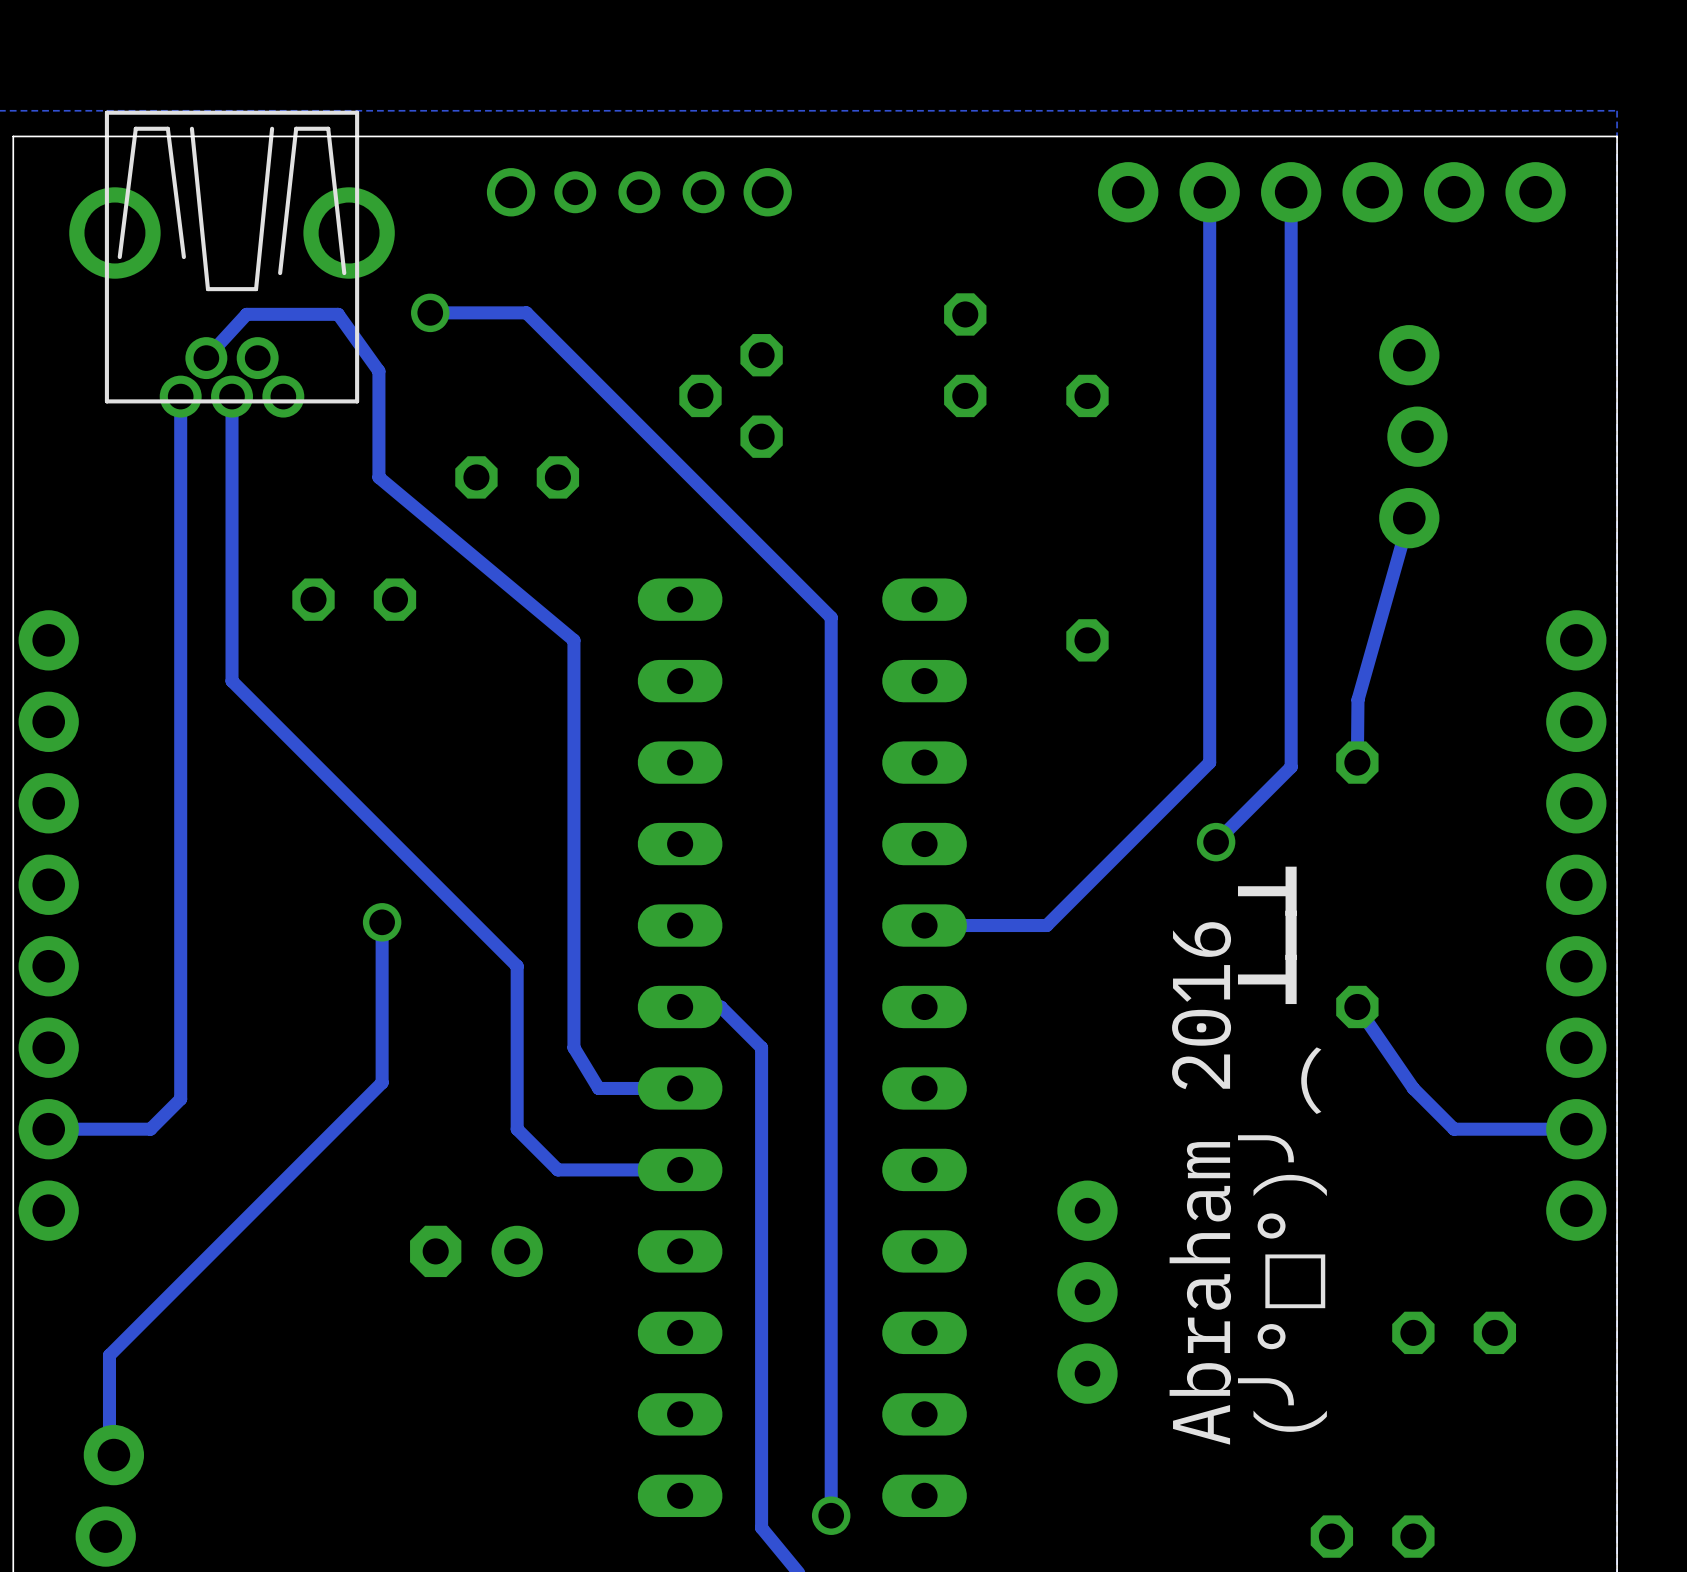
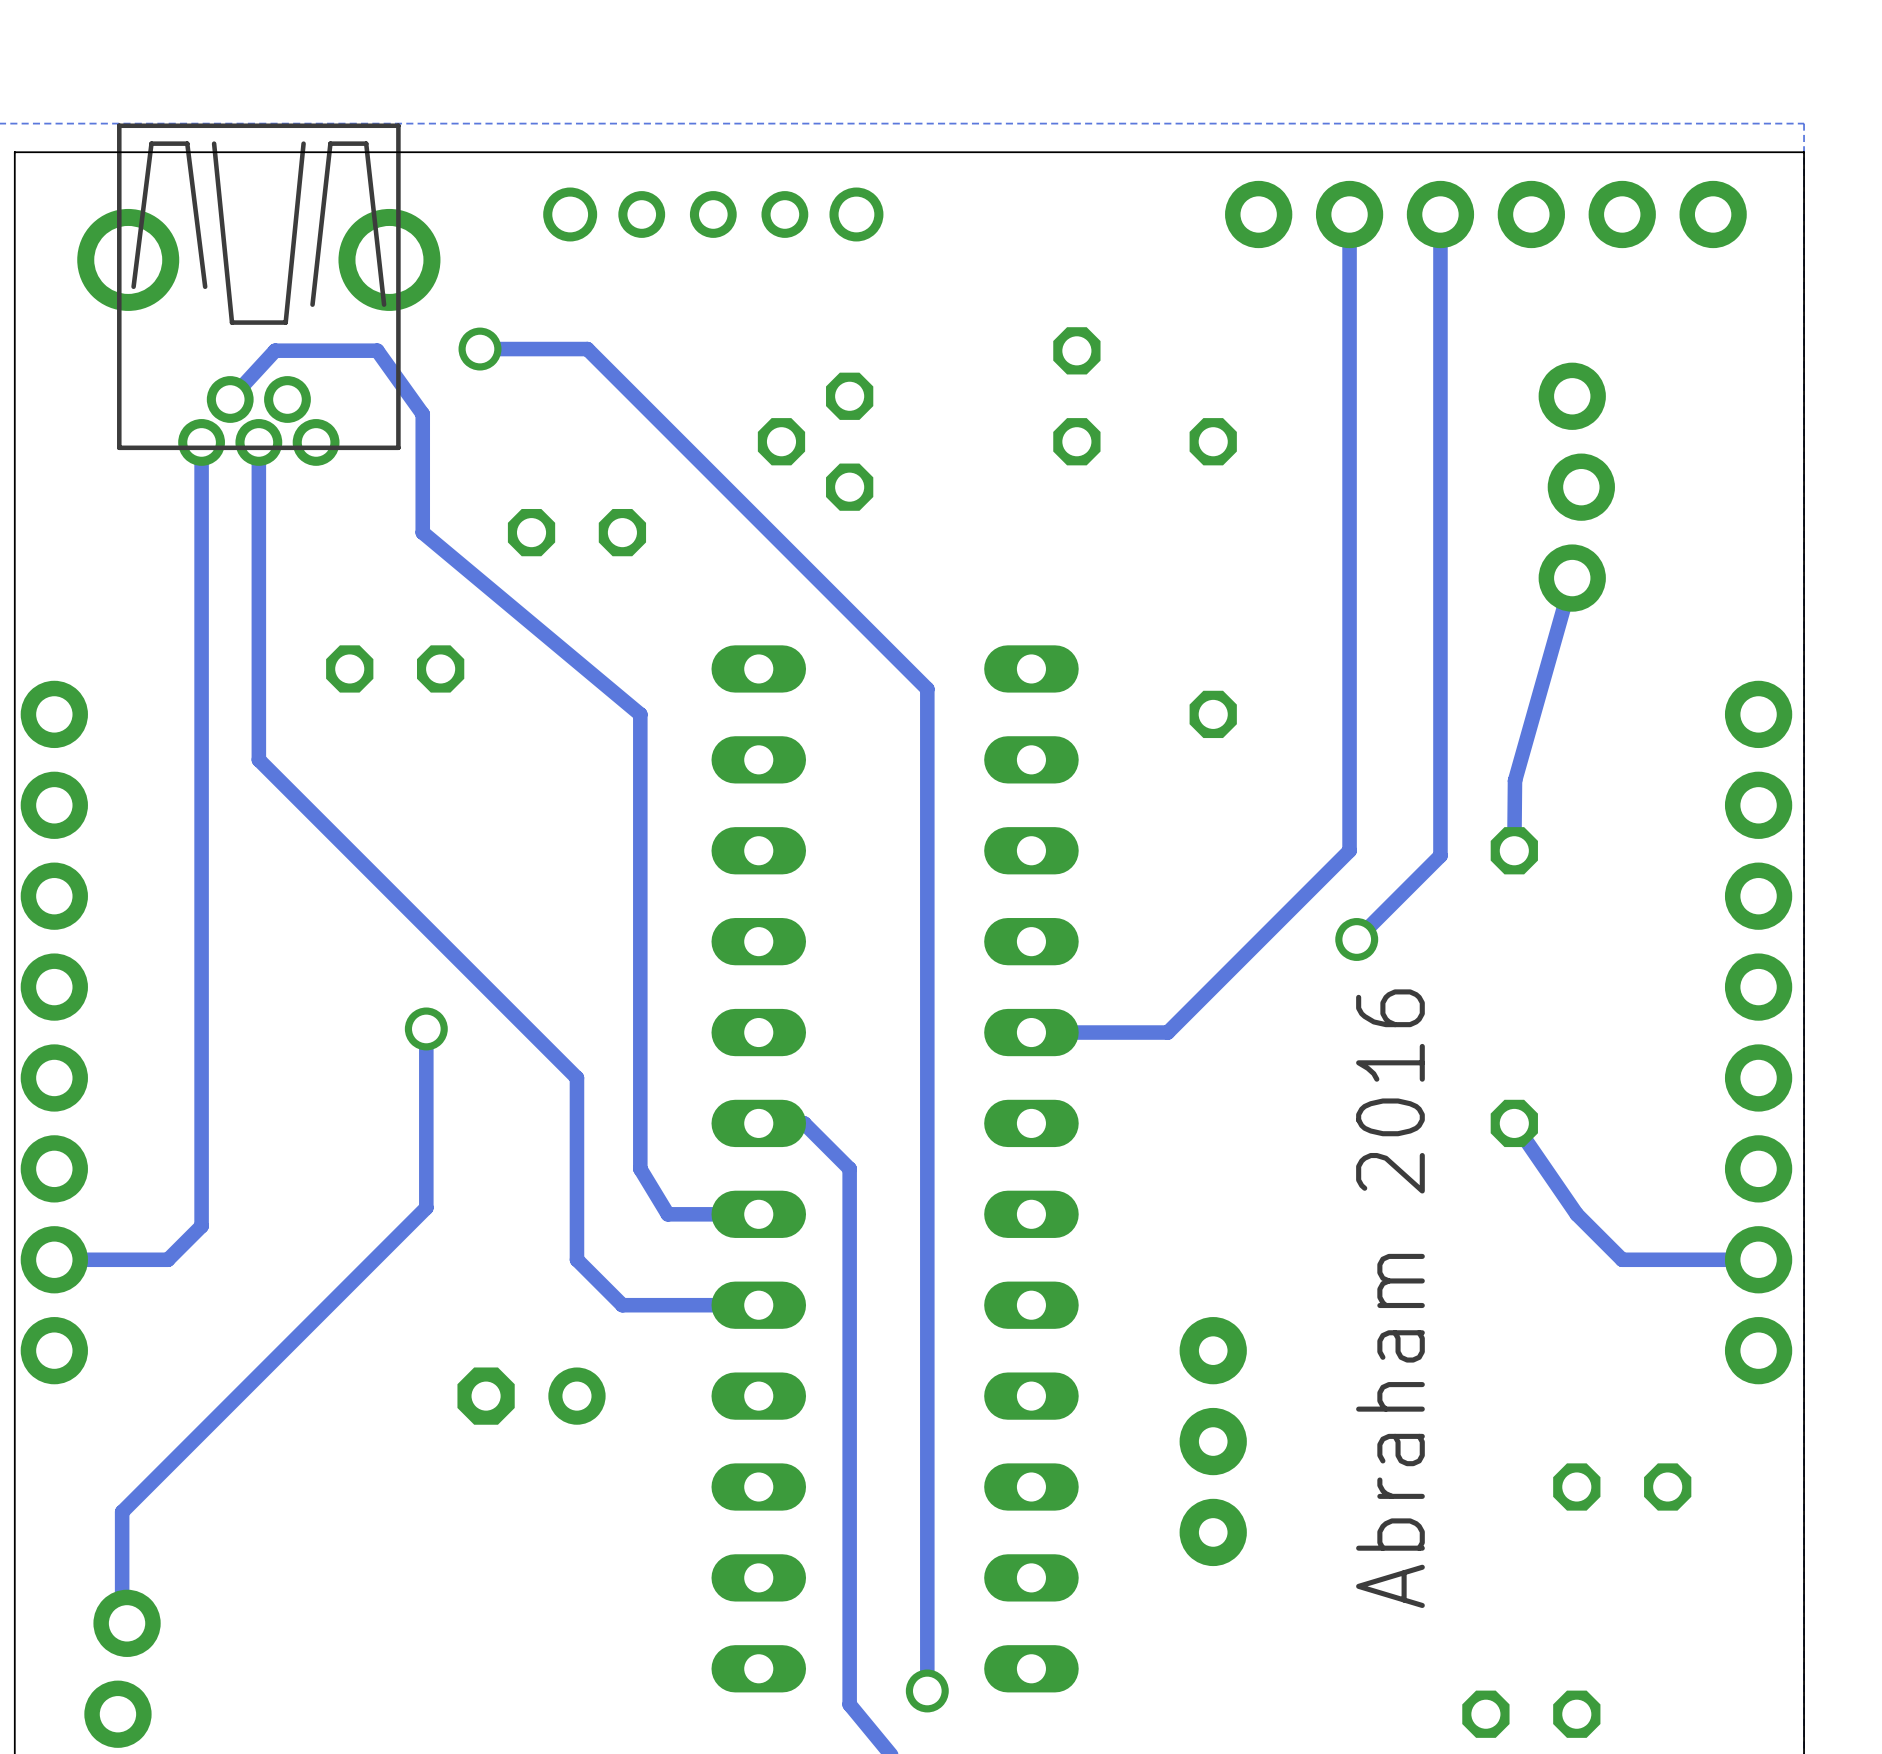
text: (╯°□°)╯︵ ┻━┻ (1282, 1149) -> none
text position: Abraham 2016 (1200, 1183) -> Abraham 2016 (1390, 1298)

